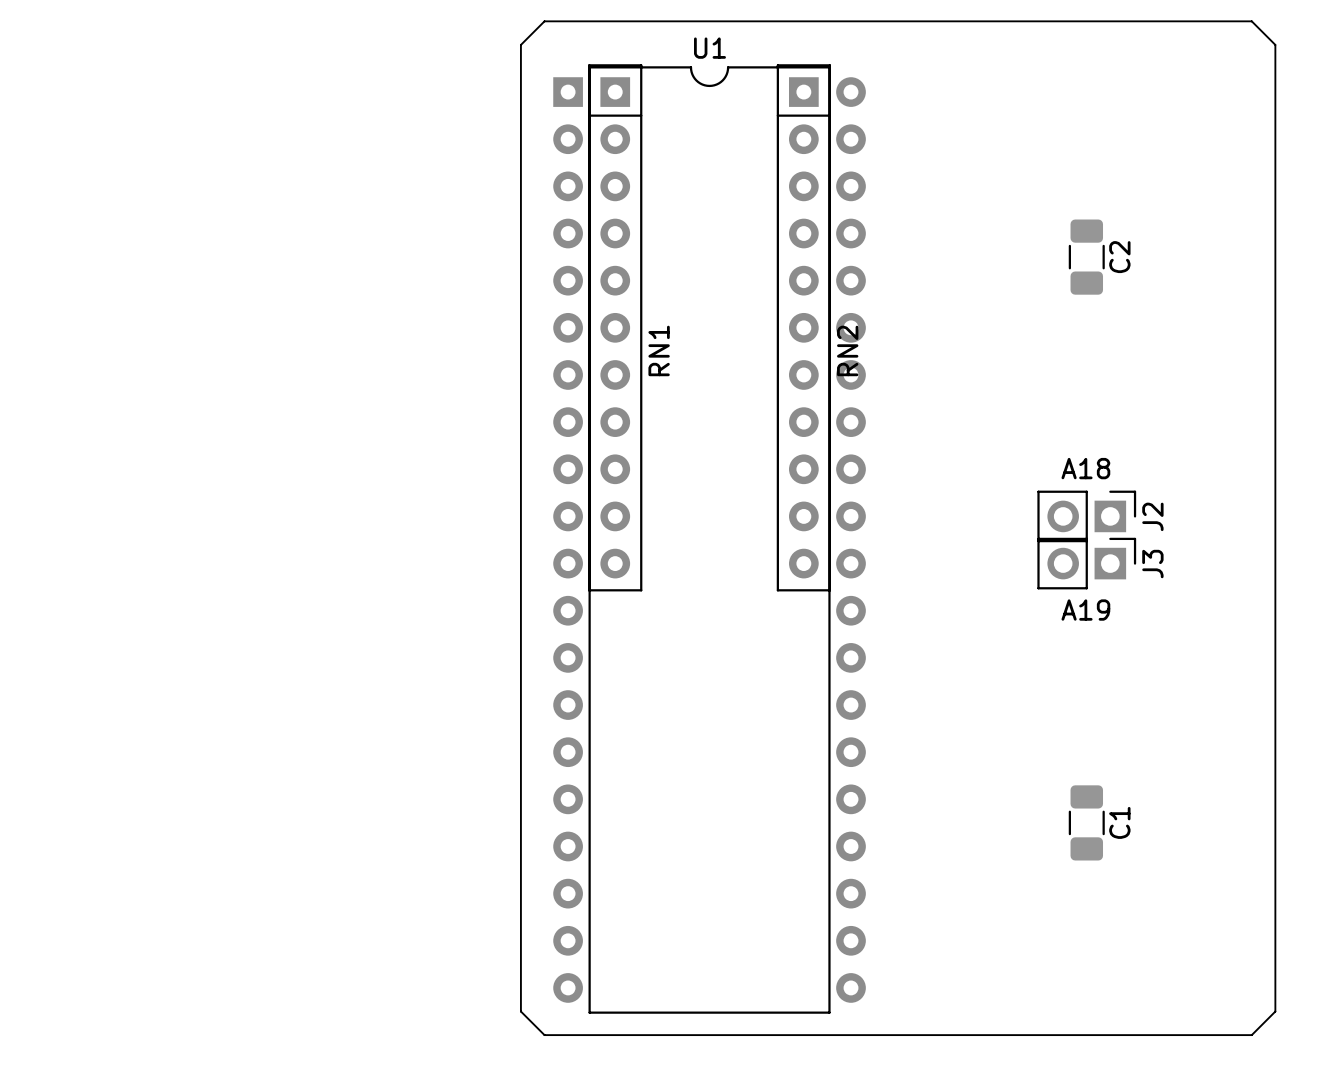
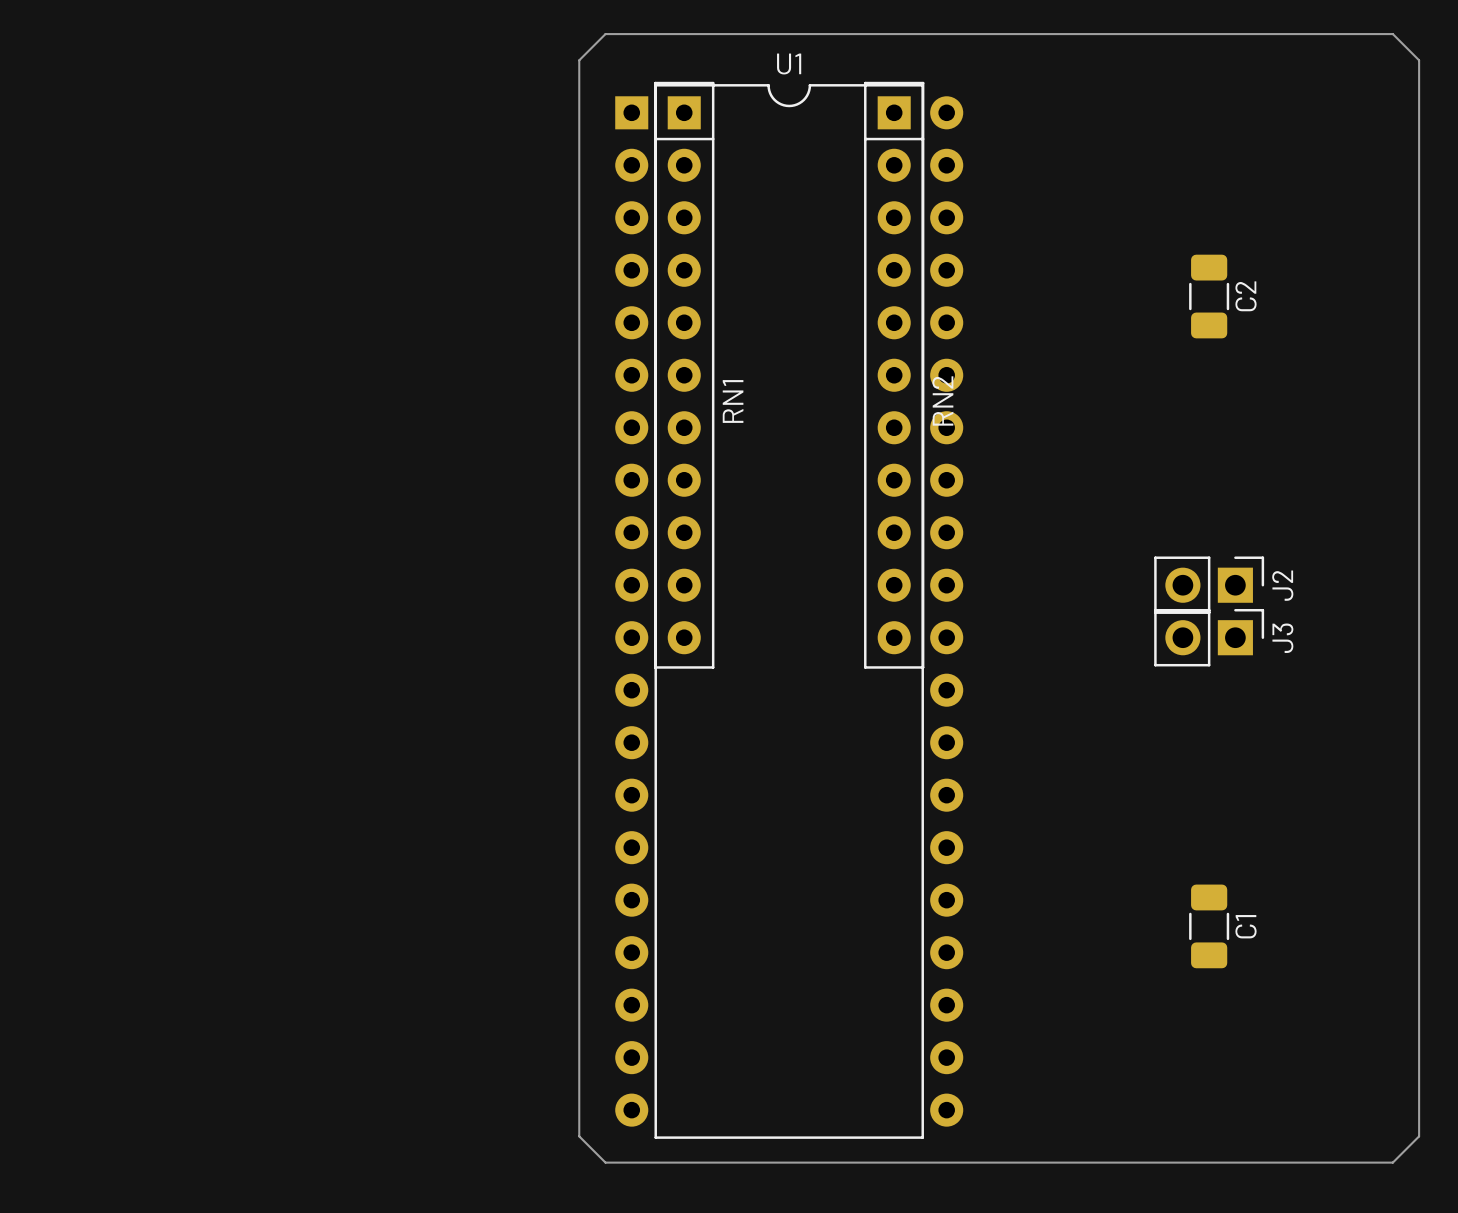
text: A18 (1085, 468) -> none
text: A19 (1085, 610) -> none

